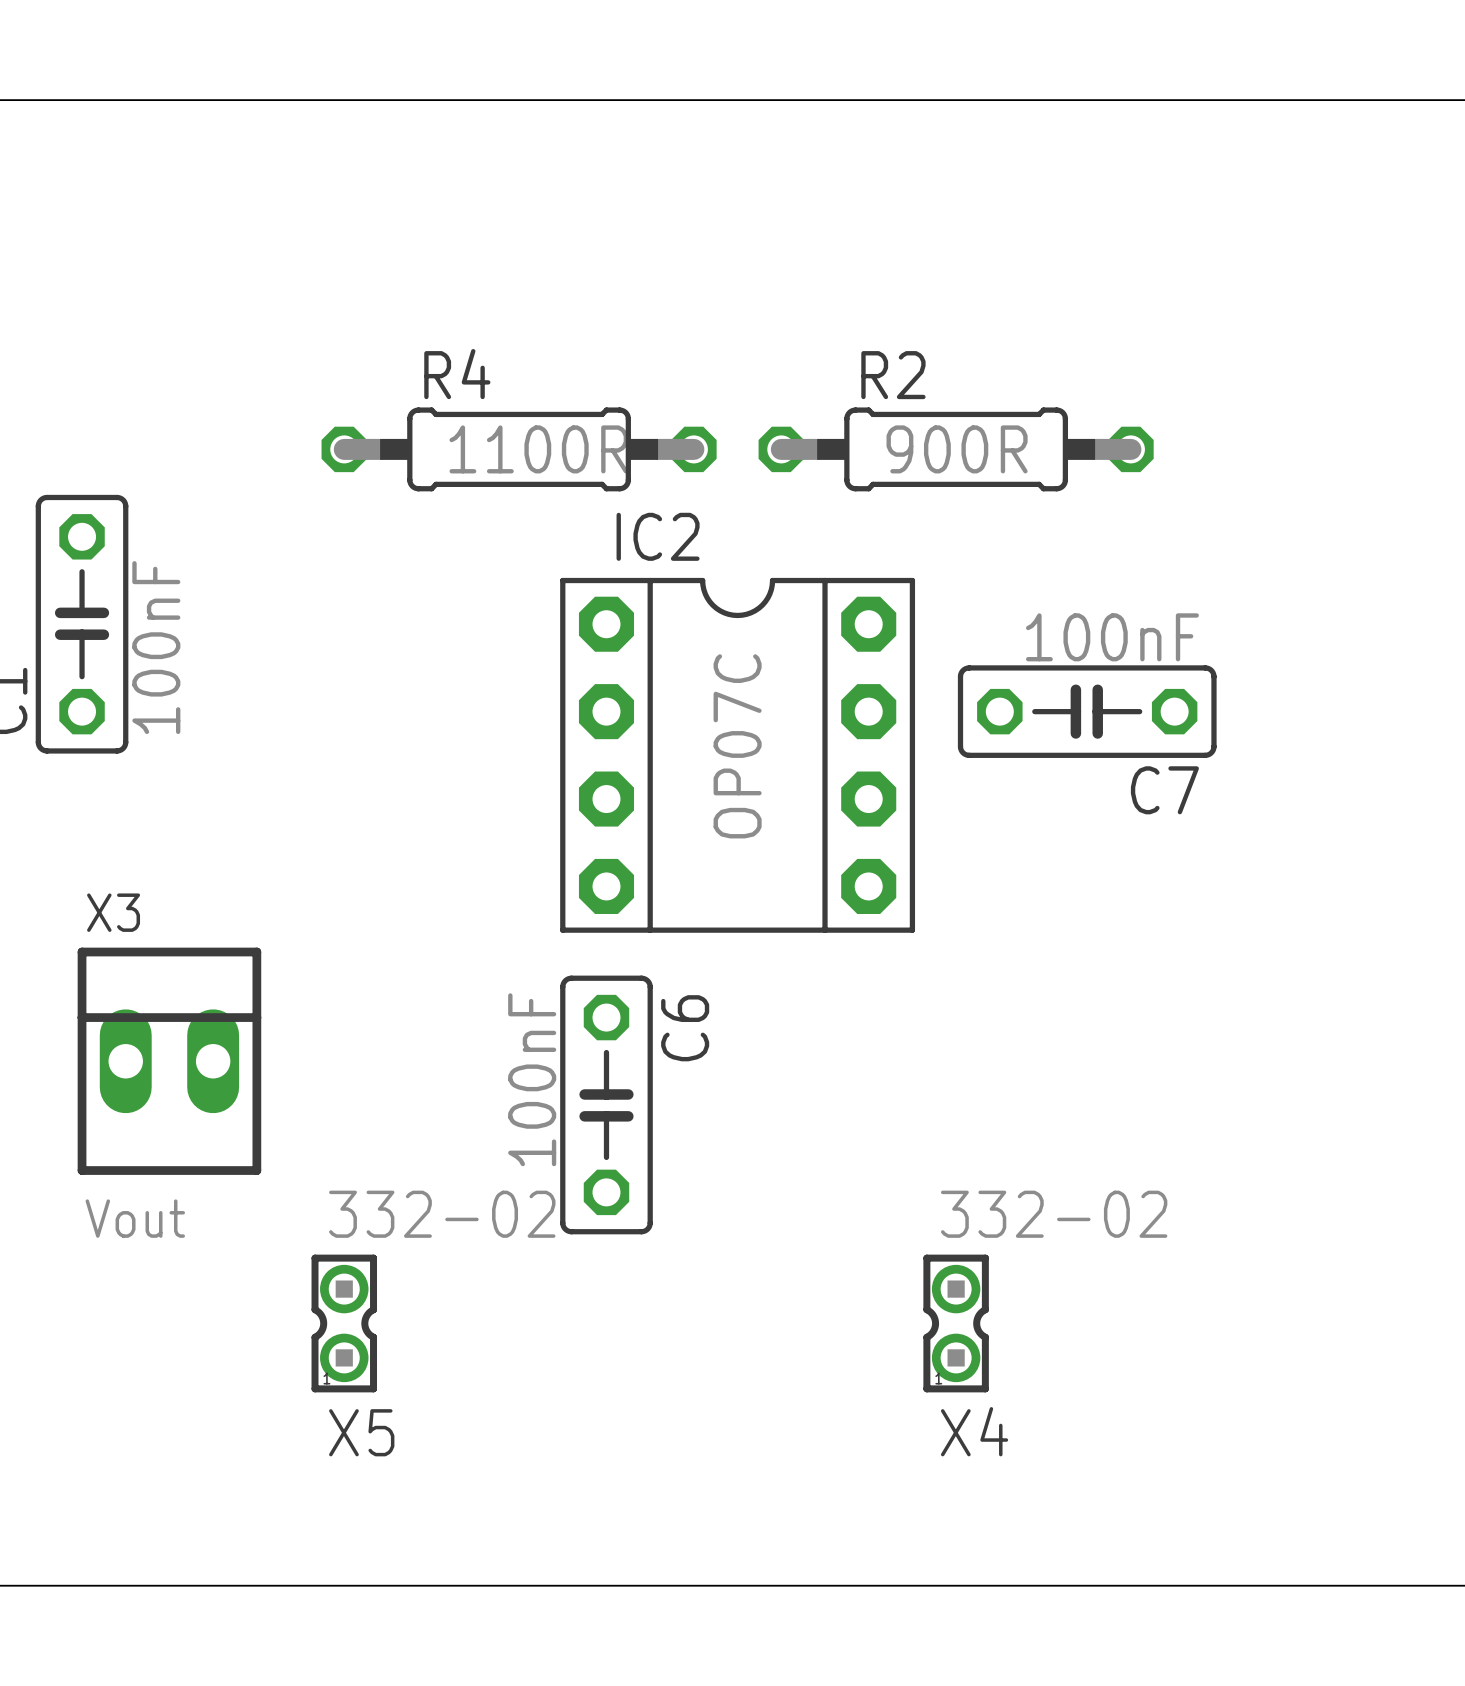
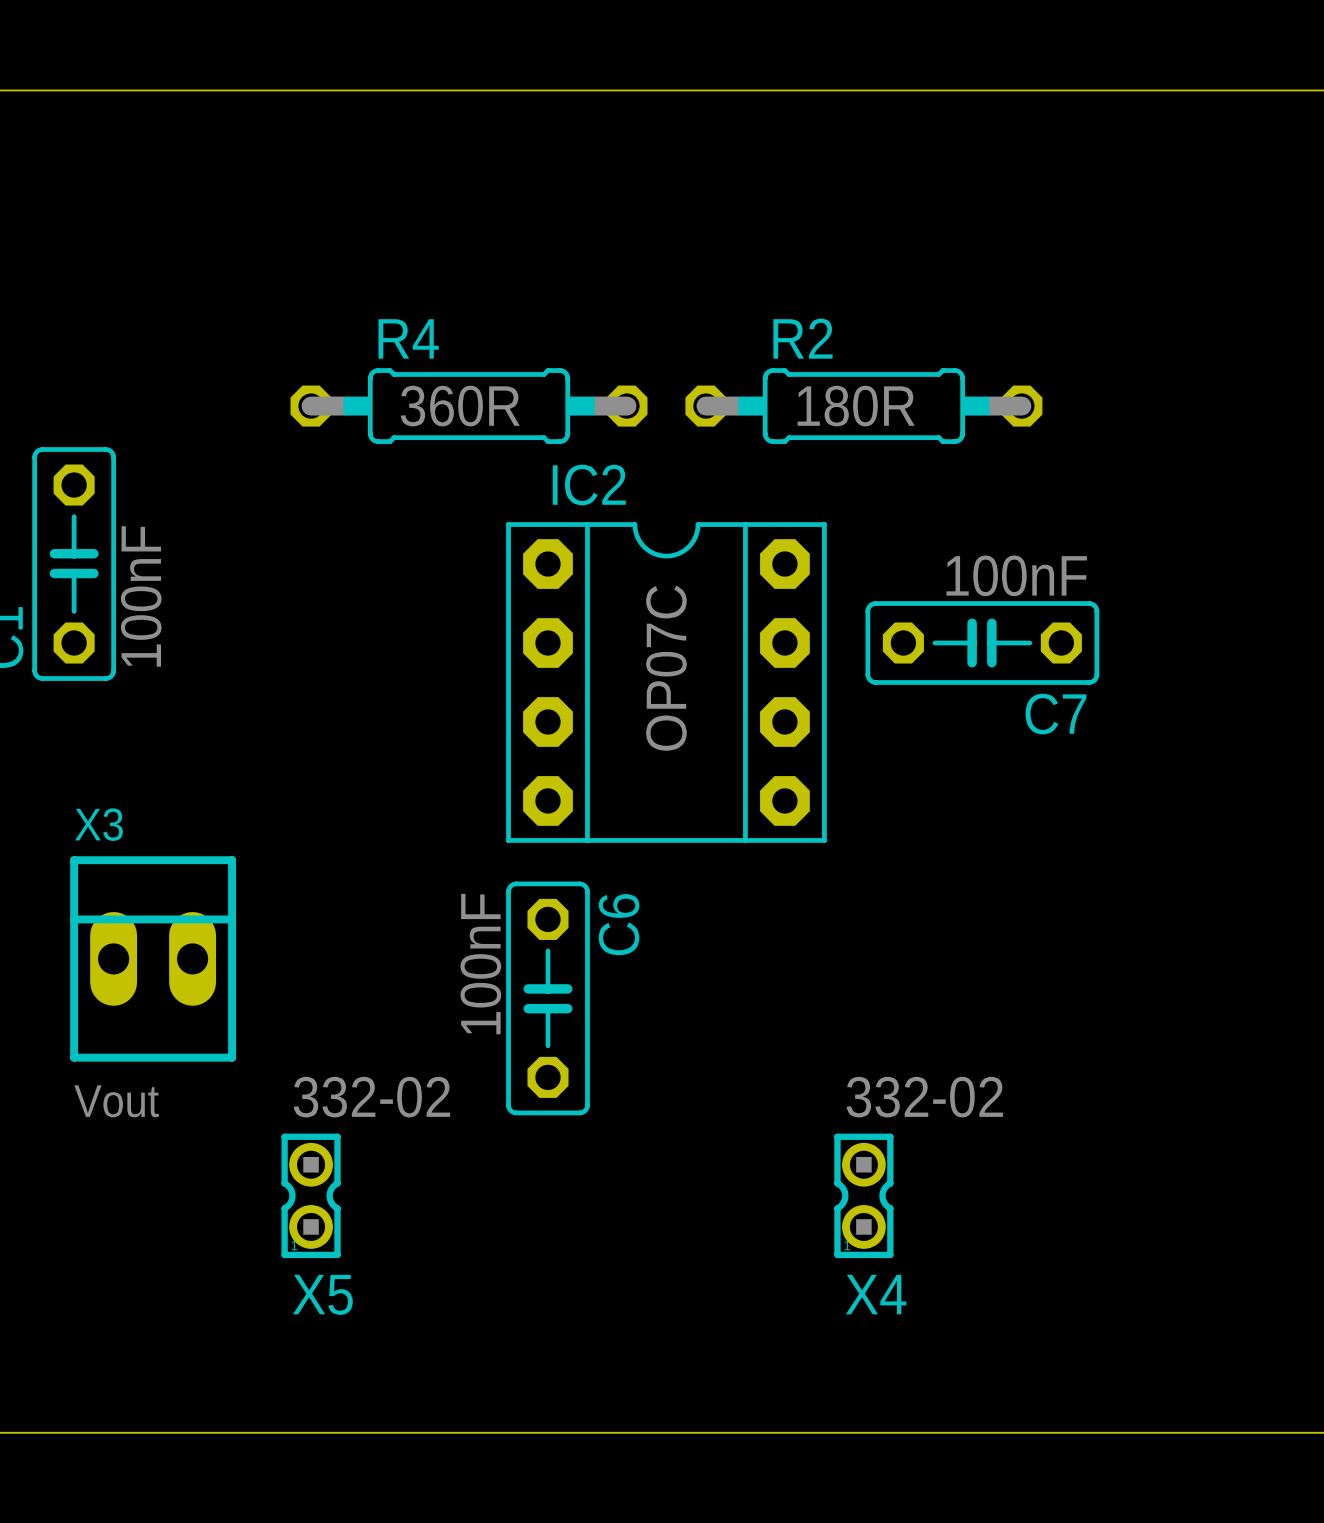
R4 value: 1100R (538, 449) -> 360R (460, 406)
R2 value: 900R (957, 449) -> 180R (856, 406)

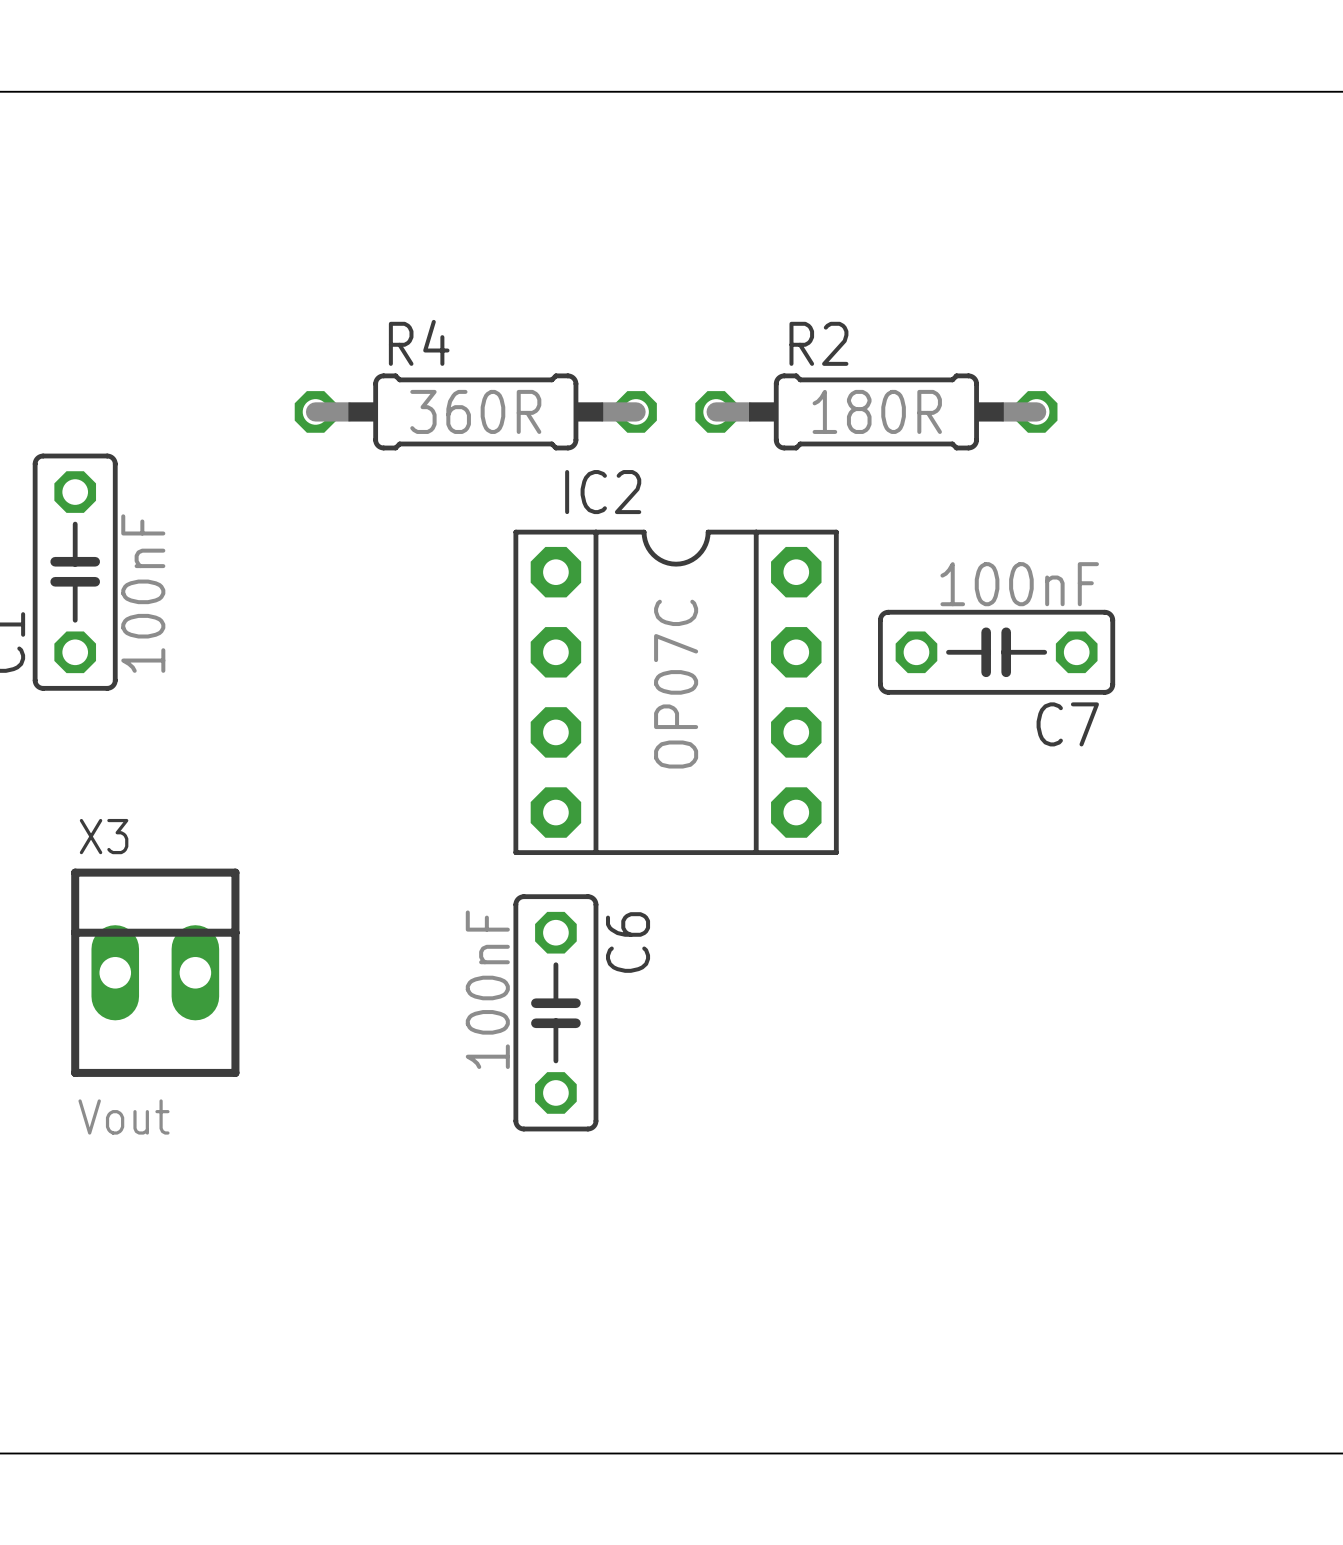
X5: 332-02 (311, 1195) -> none
X4: 332-02 (863, 1195) -> none

